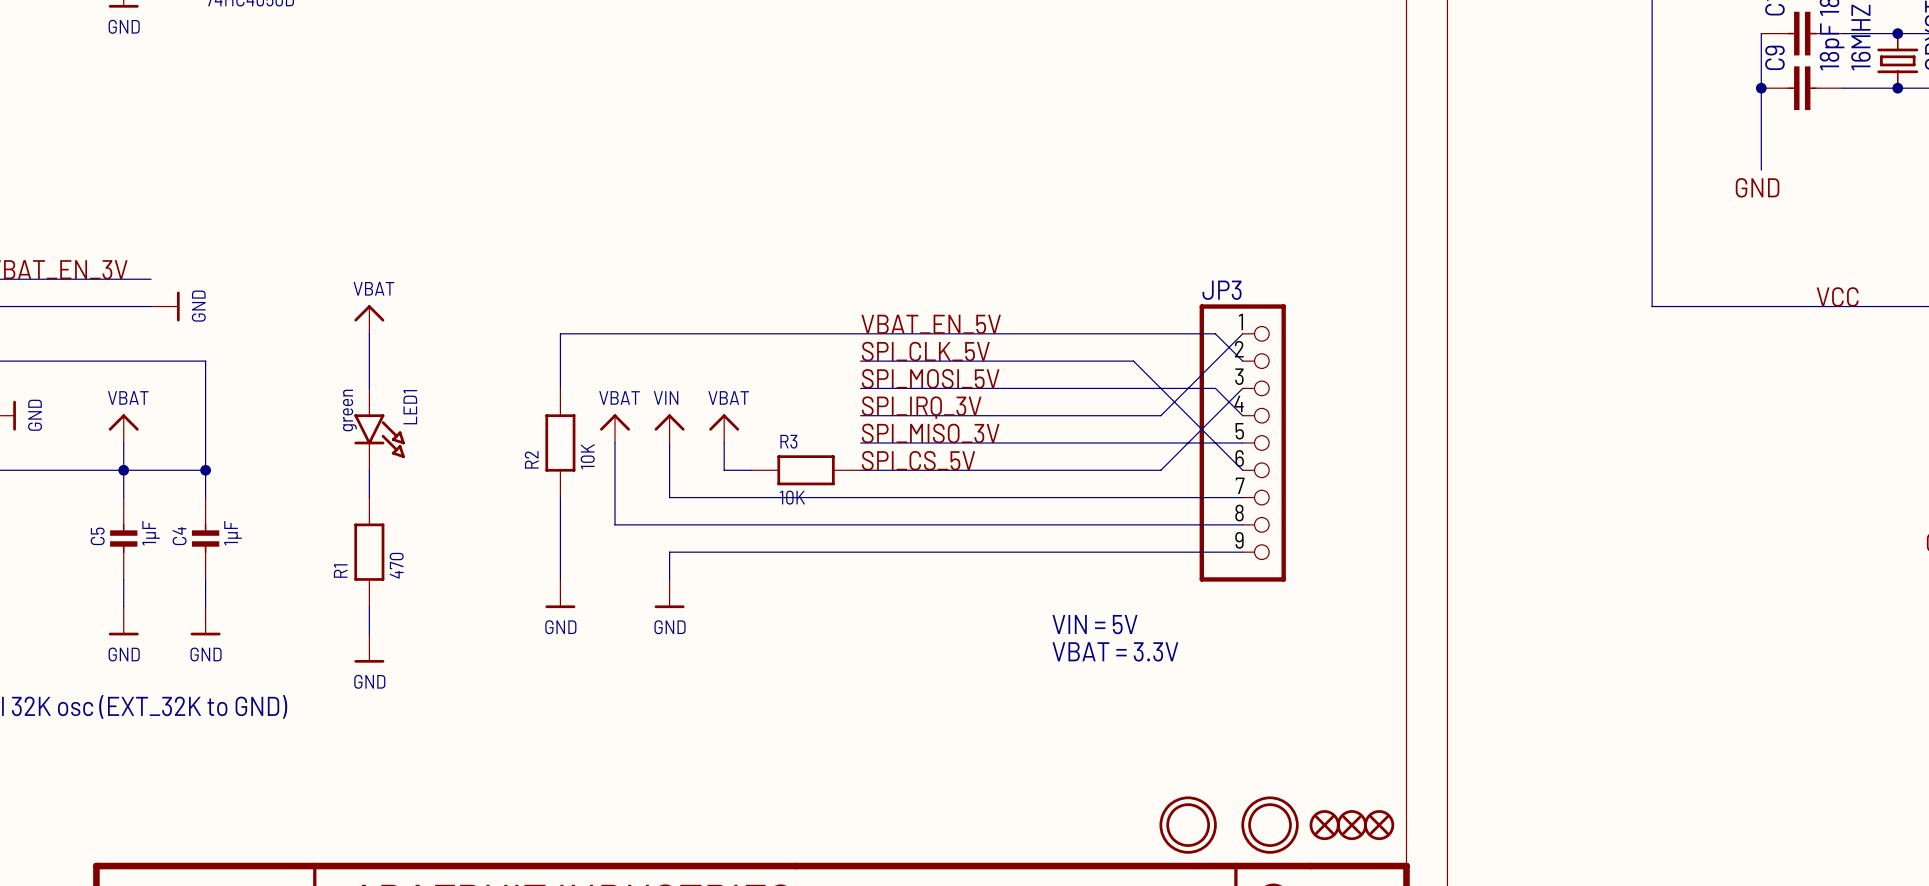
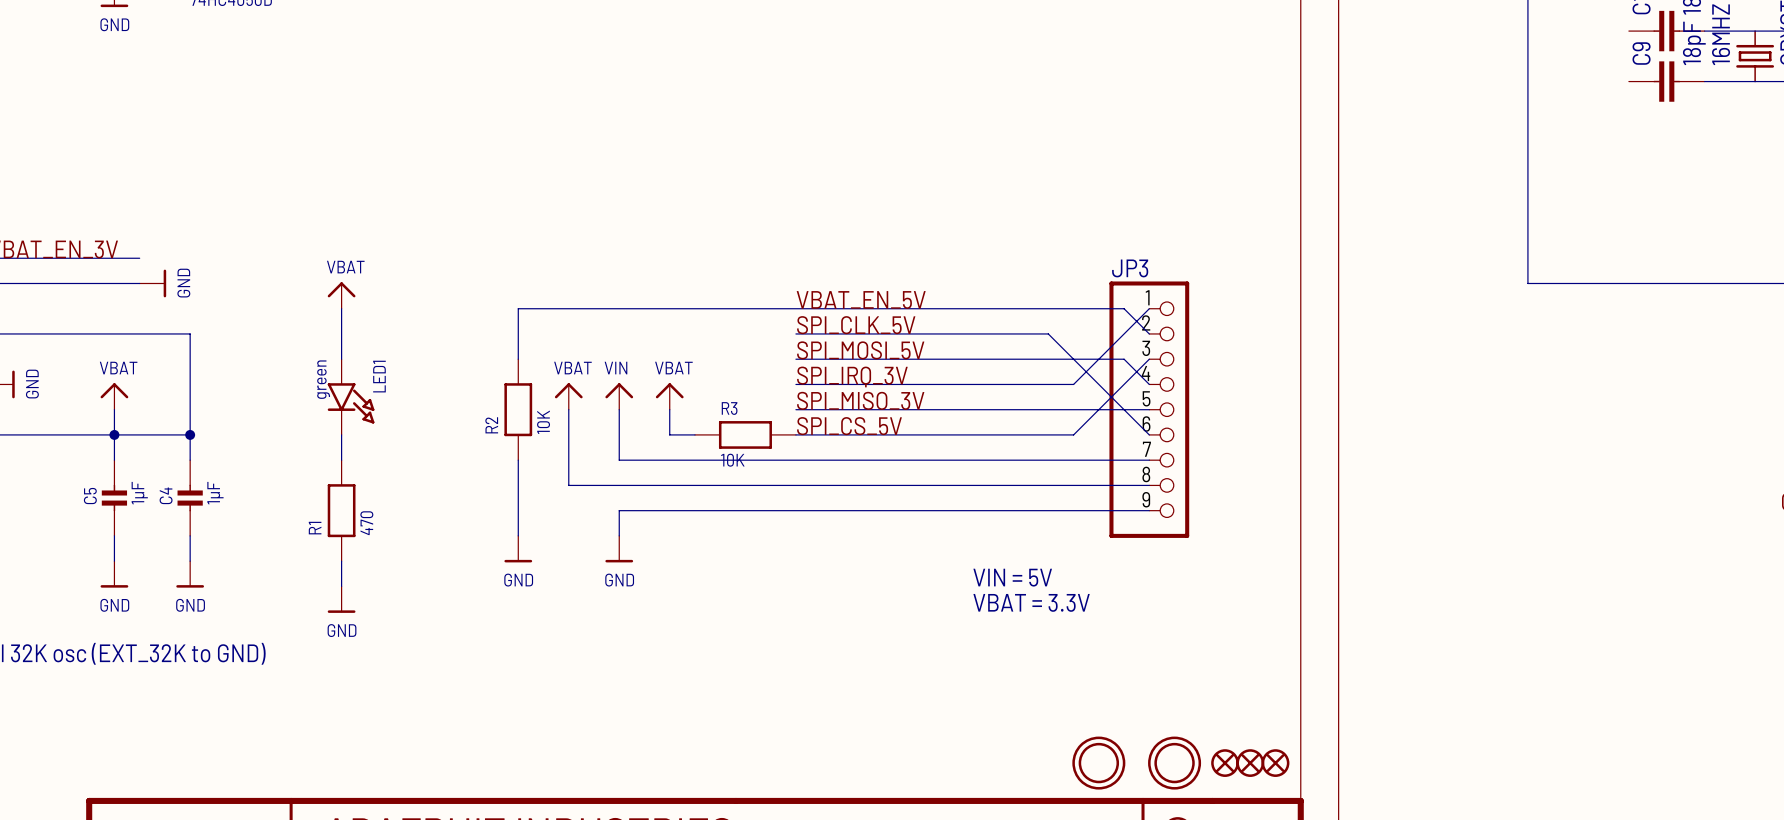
wire: (1761, 33) (1761, 170) -> none
junction: (1897, 33) -> none
junction: (1761, 88) -> none
junction: (1897, 88) -> none
label: GND (1757, 187) -> none
label: VCC (1837, 296) -> none

